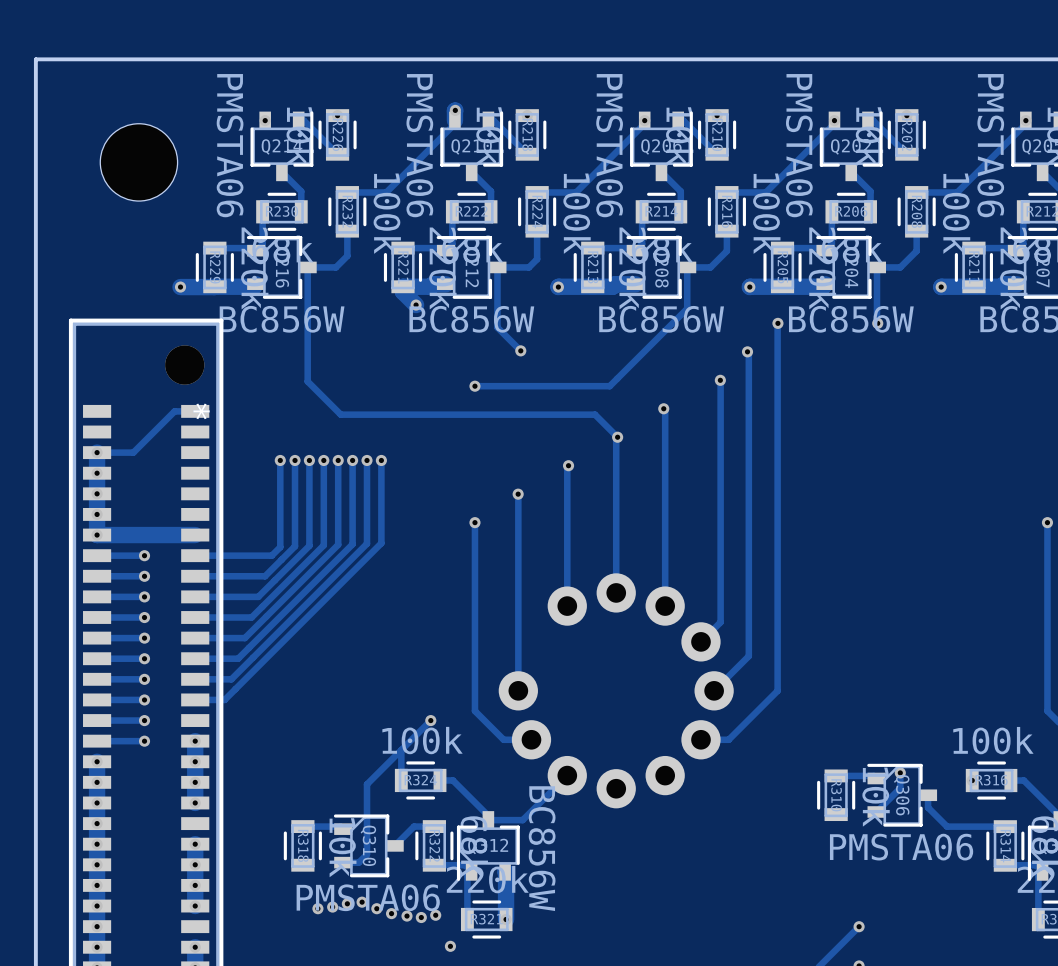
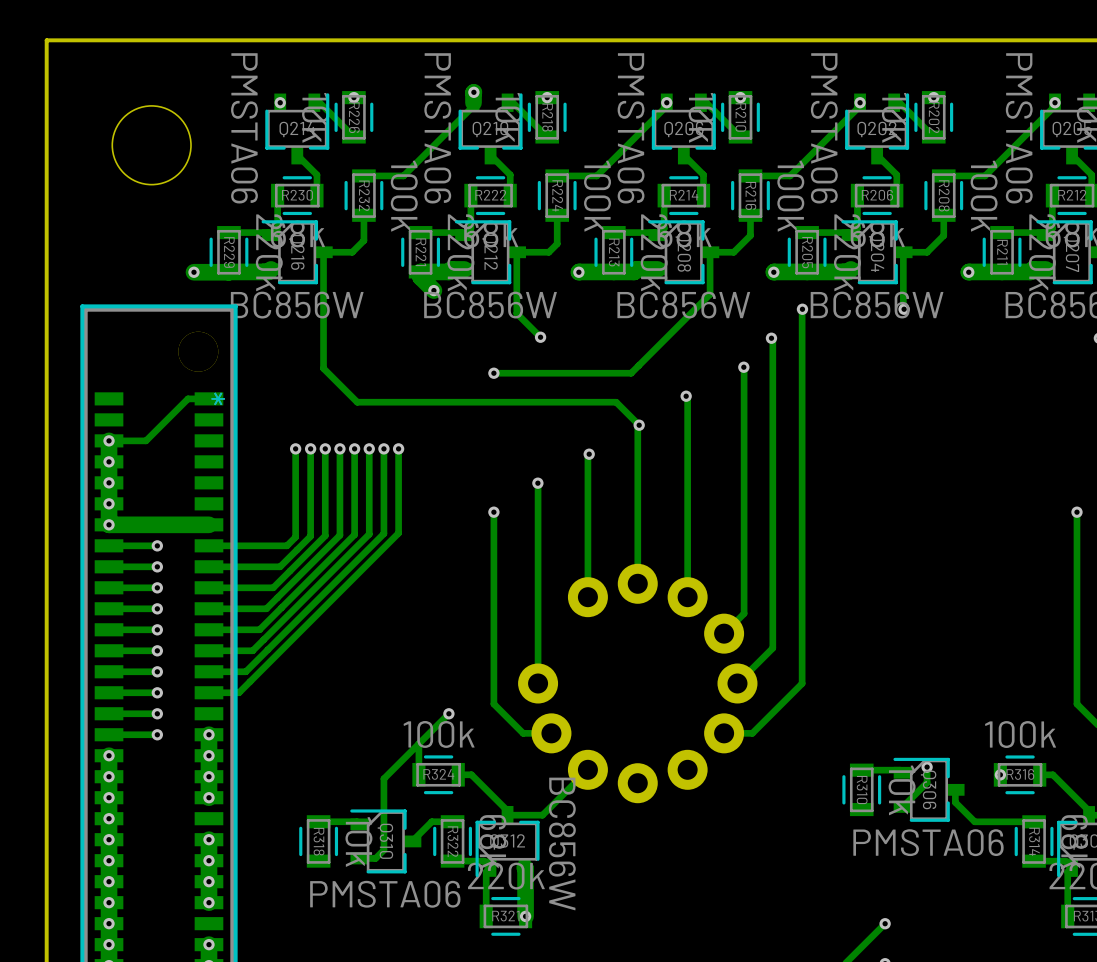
via: (362, 902) -> none
via: (347, 903) -> none
via: (332, 907) -> none
via: (317, 908) -> none
via: (376, 908) -> none
via: (391, 913) -> none
via: (435, 915) -> none
via: (407, 916) -> none
via: (421, 917) -> none
via: (450, 946) -> none

